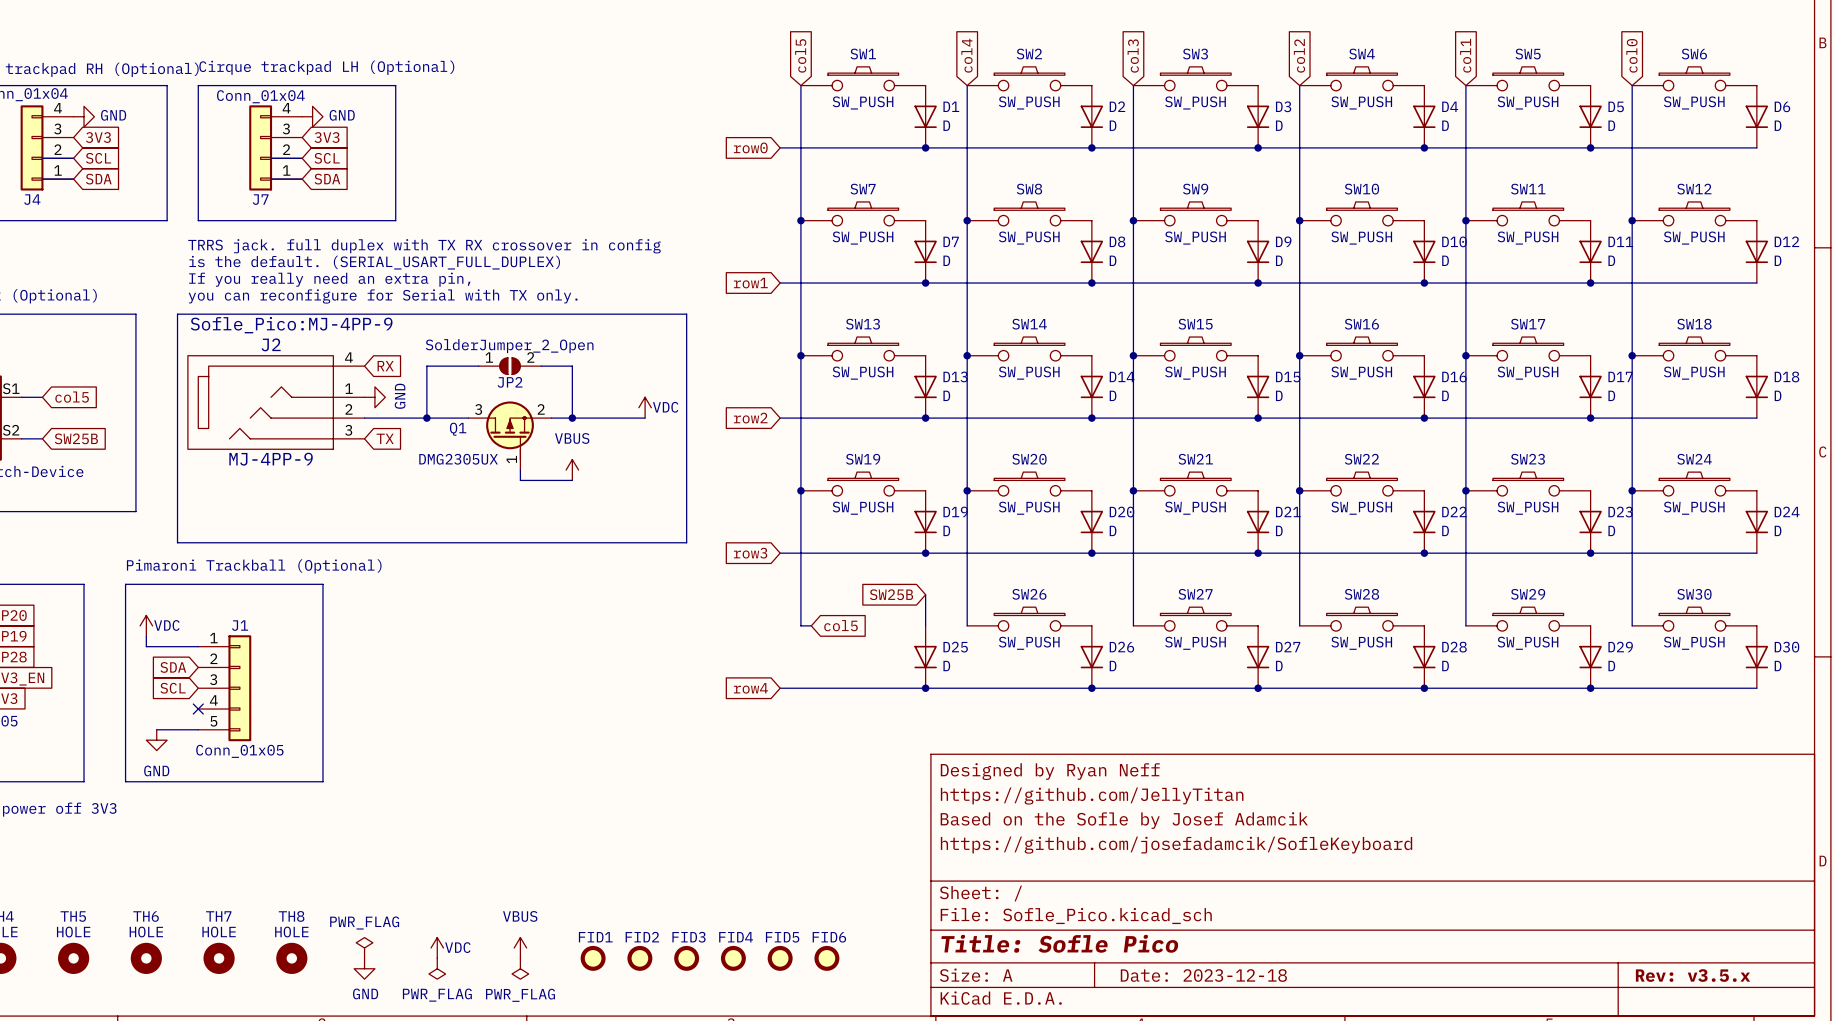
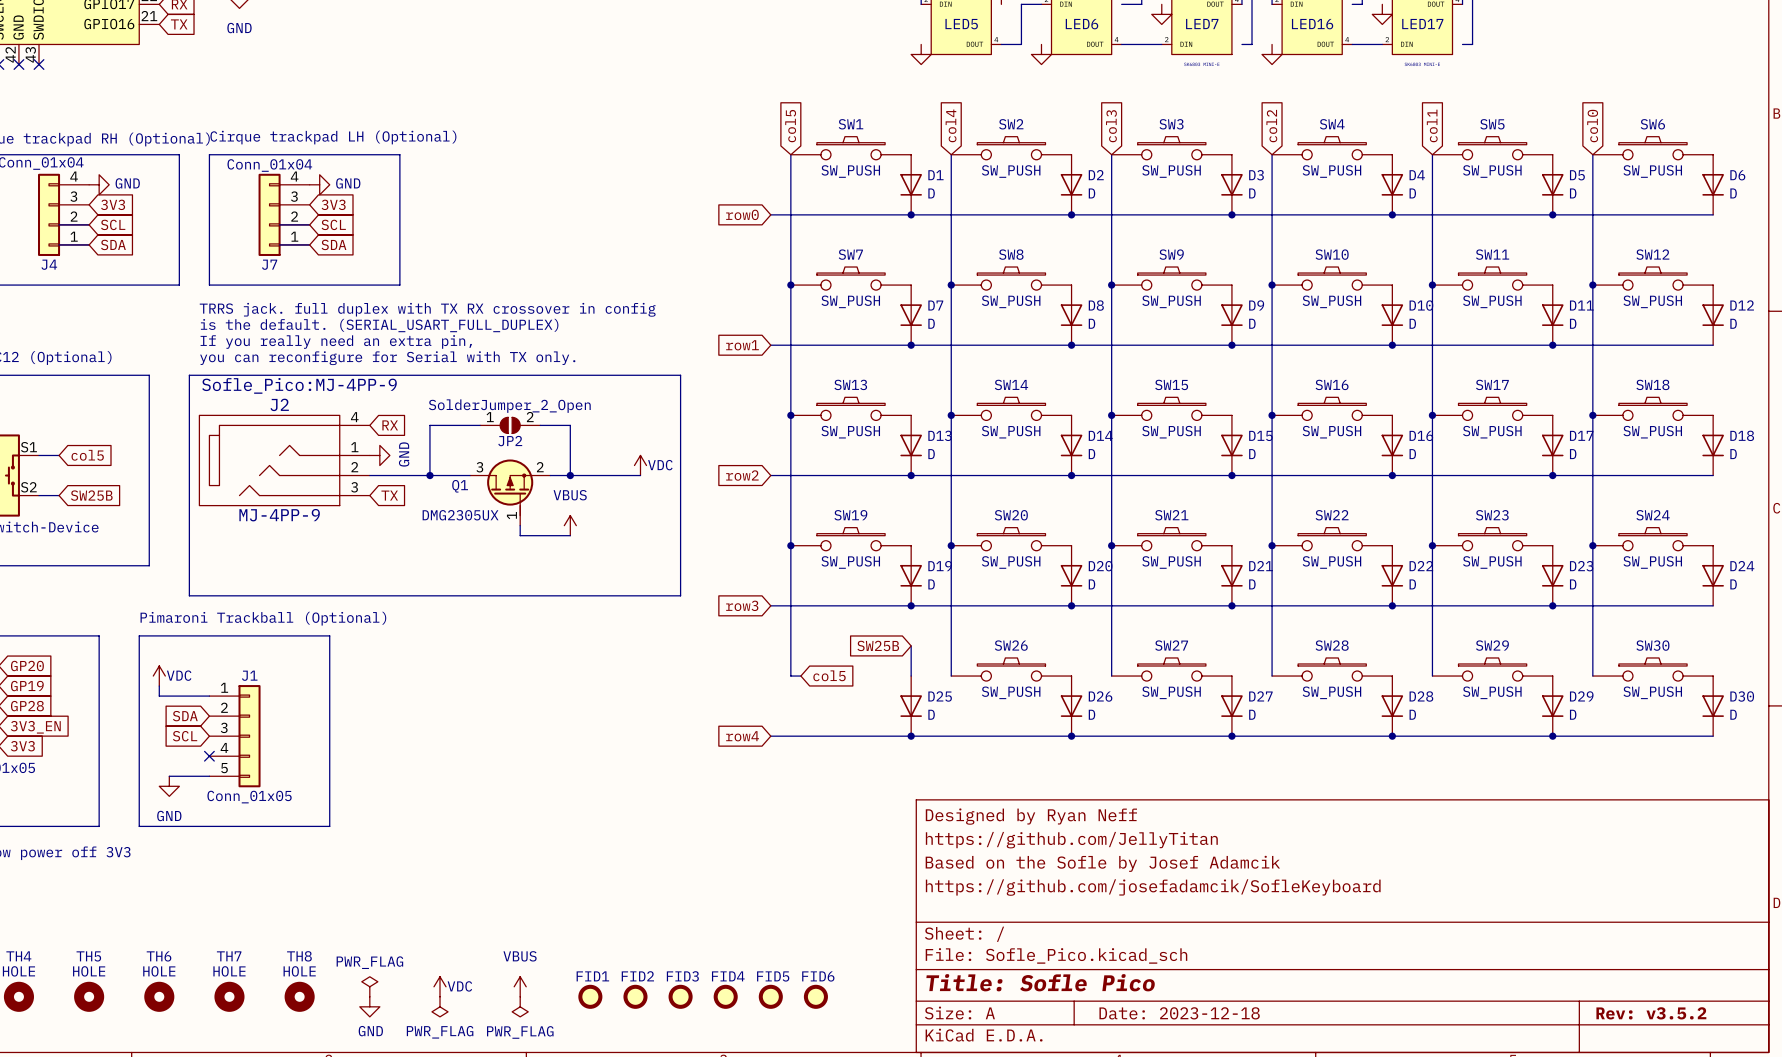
title block: Rev: v3.5.x (1693, 975) -> Rev: v3.5.2 (1651, 1013)

